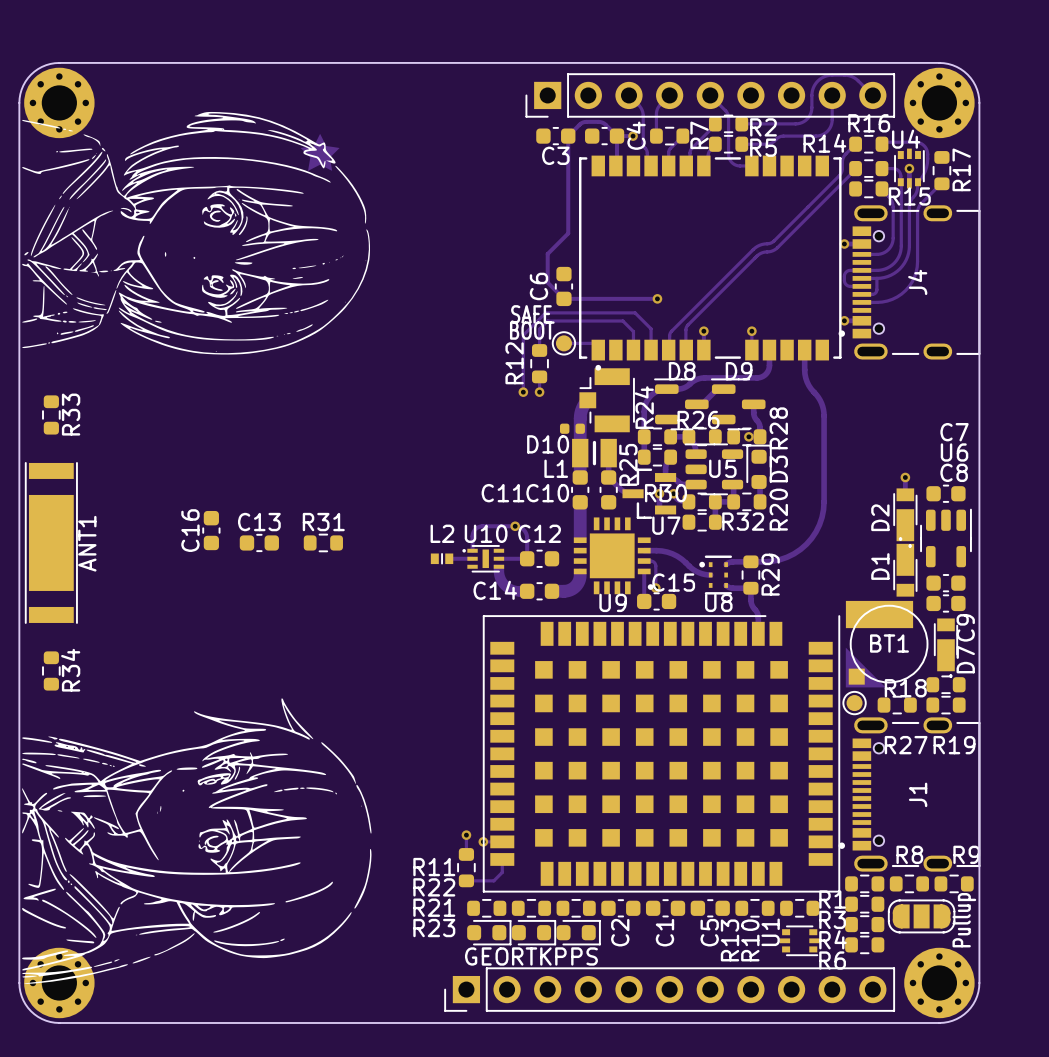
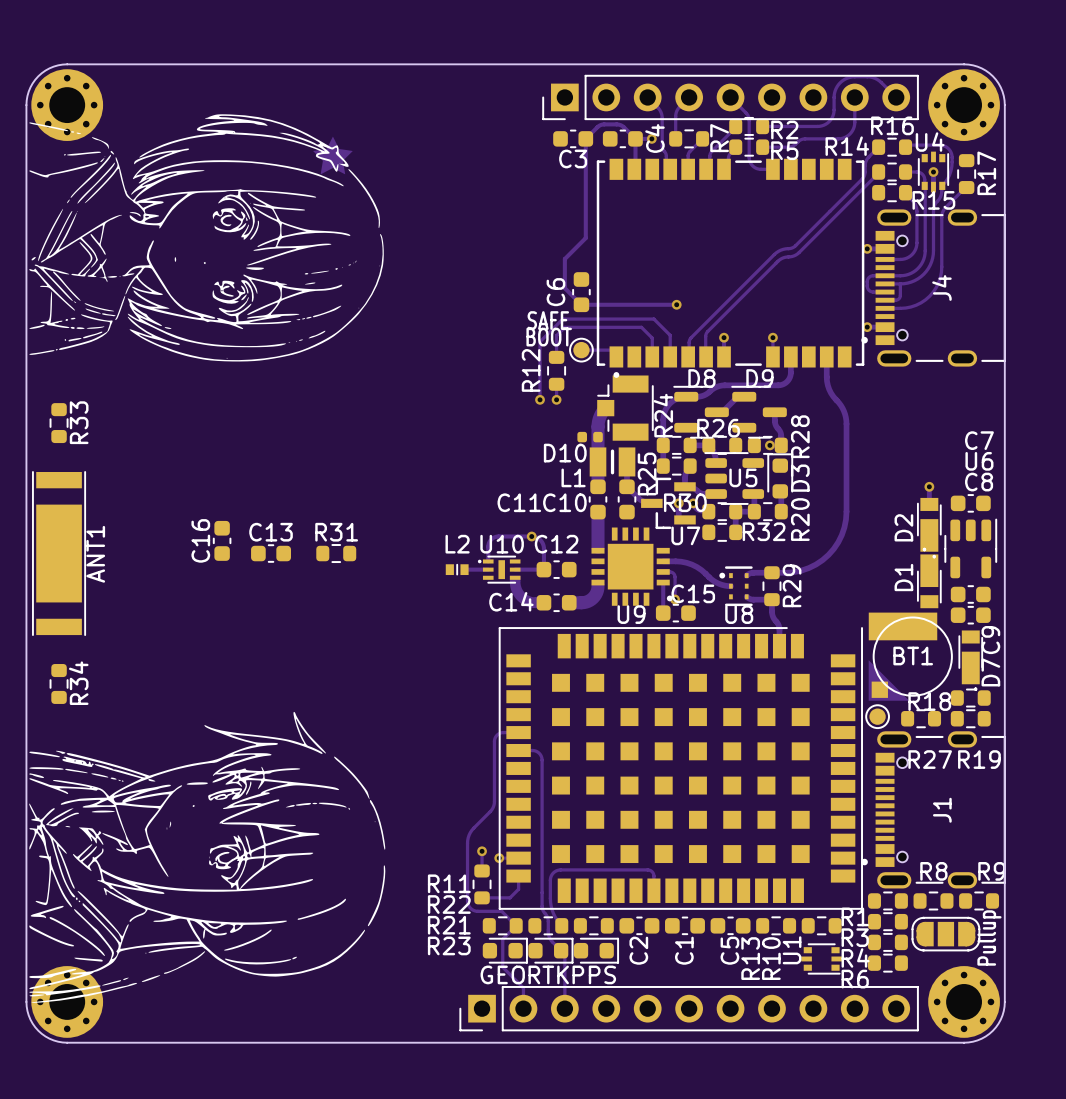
track: none -> (518, 732) (501, 732) (494, 738) (494, 803) (491, 810) (471, 830) (468, 837) (467, 900) (469, 907) (474, 910) (501, 911) (516, 925) (502, 939) (502, 967) (523, 987) (523, 1008)
track: none -> (518, 750) (536, 751) (542, 758) (542, 907) (547, 918) (549, 938) (564, 954) (564, 1008)
track: none -> (653, 890) (653, 874) (649, 870) (557, 870) (550, 877) (550, 902) (553, 913) (561, 925)

